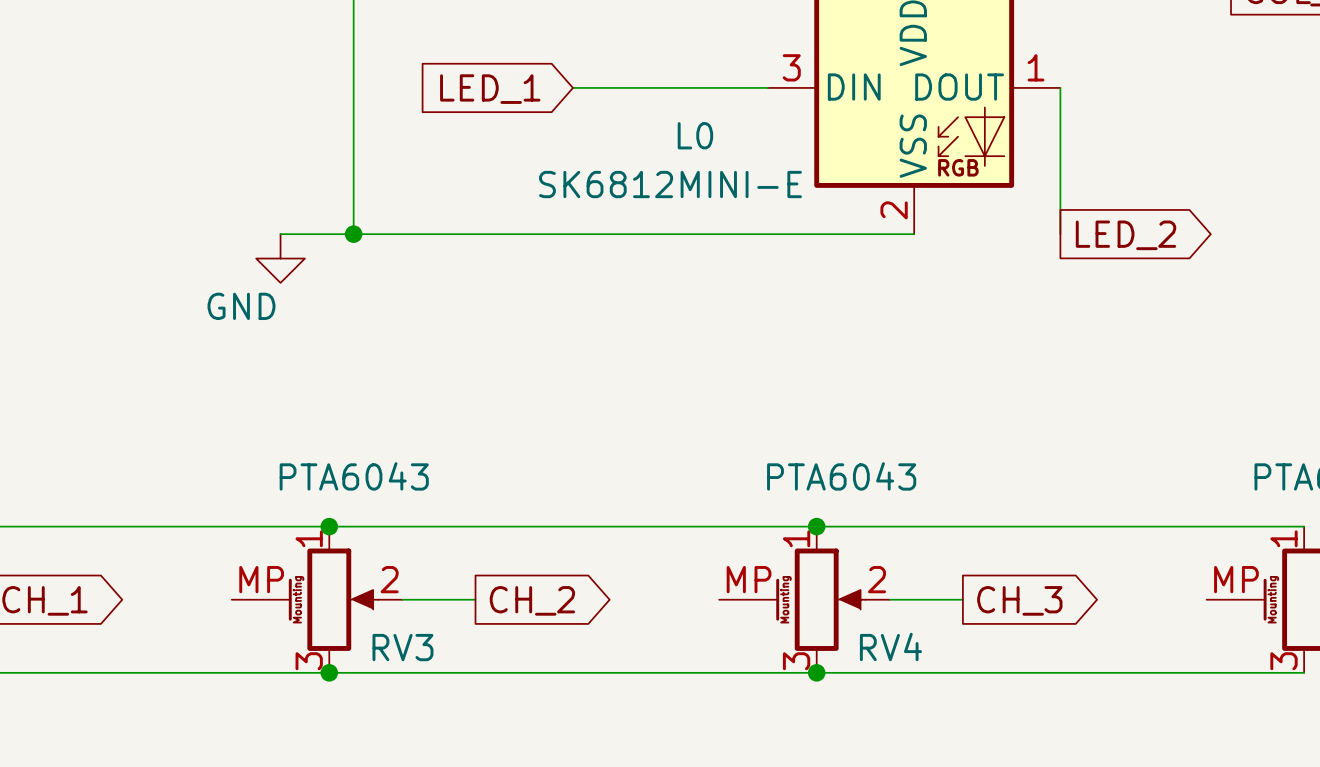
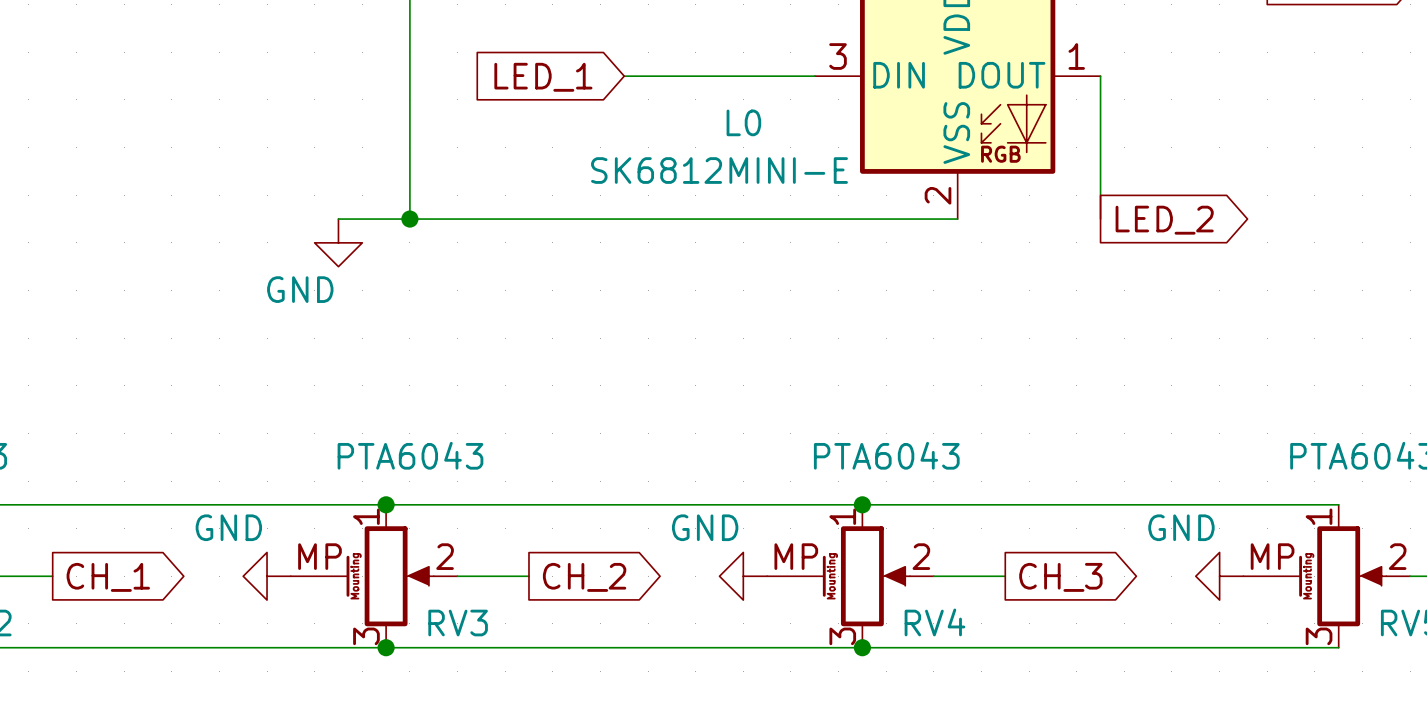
power symbol: none -> GND (267, 576)
power symbol: none -> GND (743, 576)
power symbol: none -> GND (1219, 576)

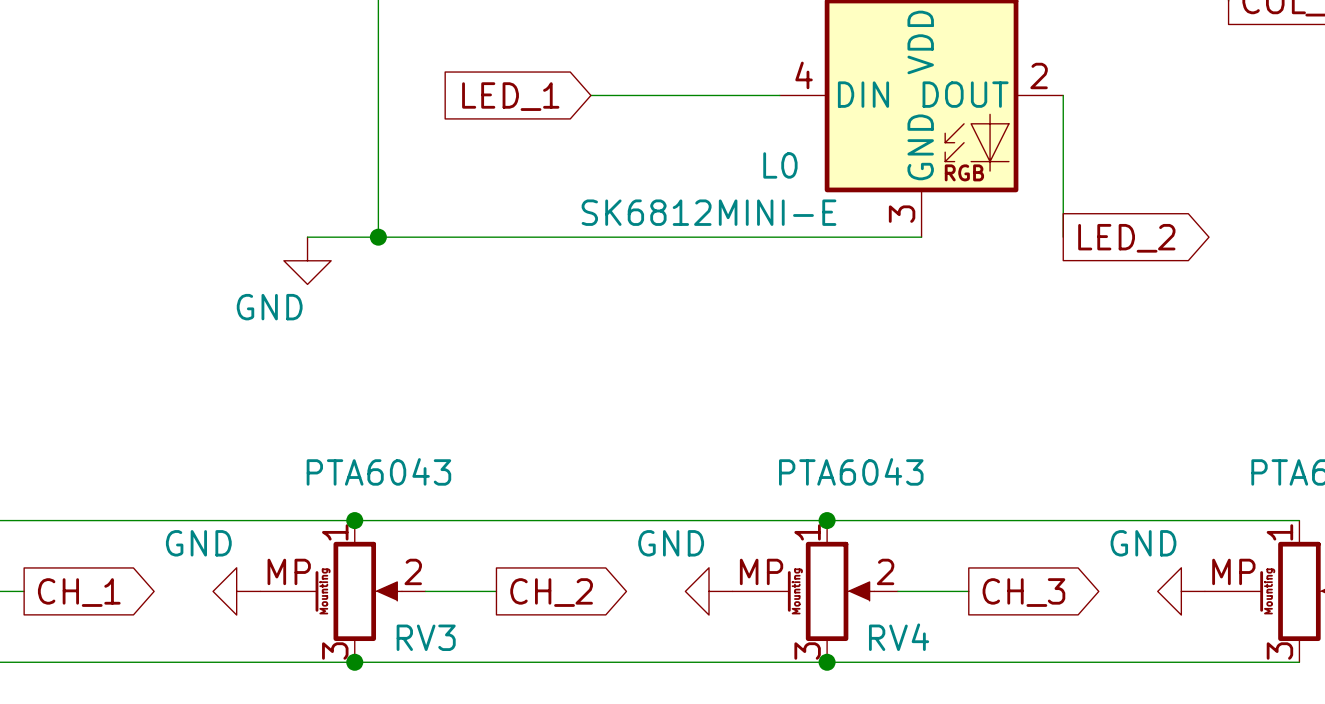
L0 pin number: 3 (838, 56) -> 4 (804, 75)
L0 pin number: 1 (1076, 56) -> 2 (1039, 75)
L0 name position: L0 (743, 122) -> L0 (780, 165)
L0 pin name: VSS (956, 133) -> GND (920, 147)
L0 value position: SK6812MINI-E (719, 170) -> SK6812MINI-E (709, 212)
L0 pin number: 2 (938, 195) -> 3 (902, 214)

